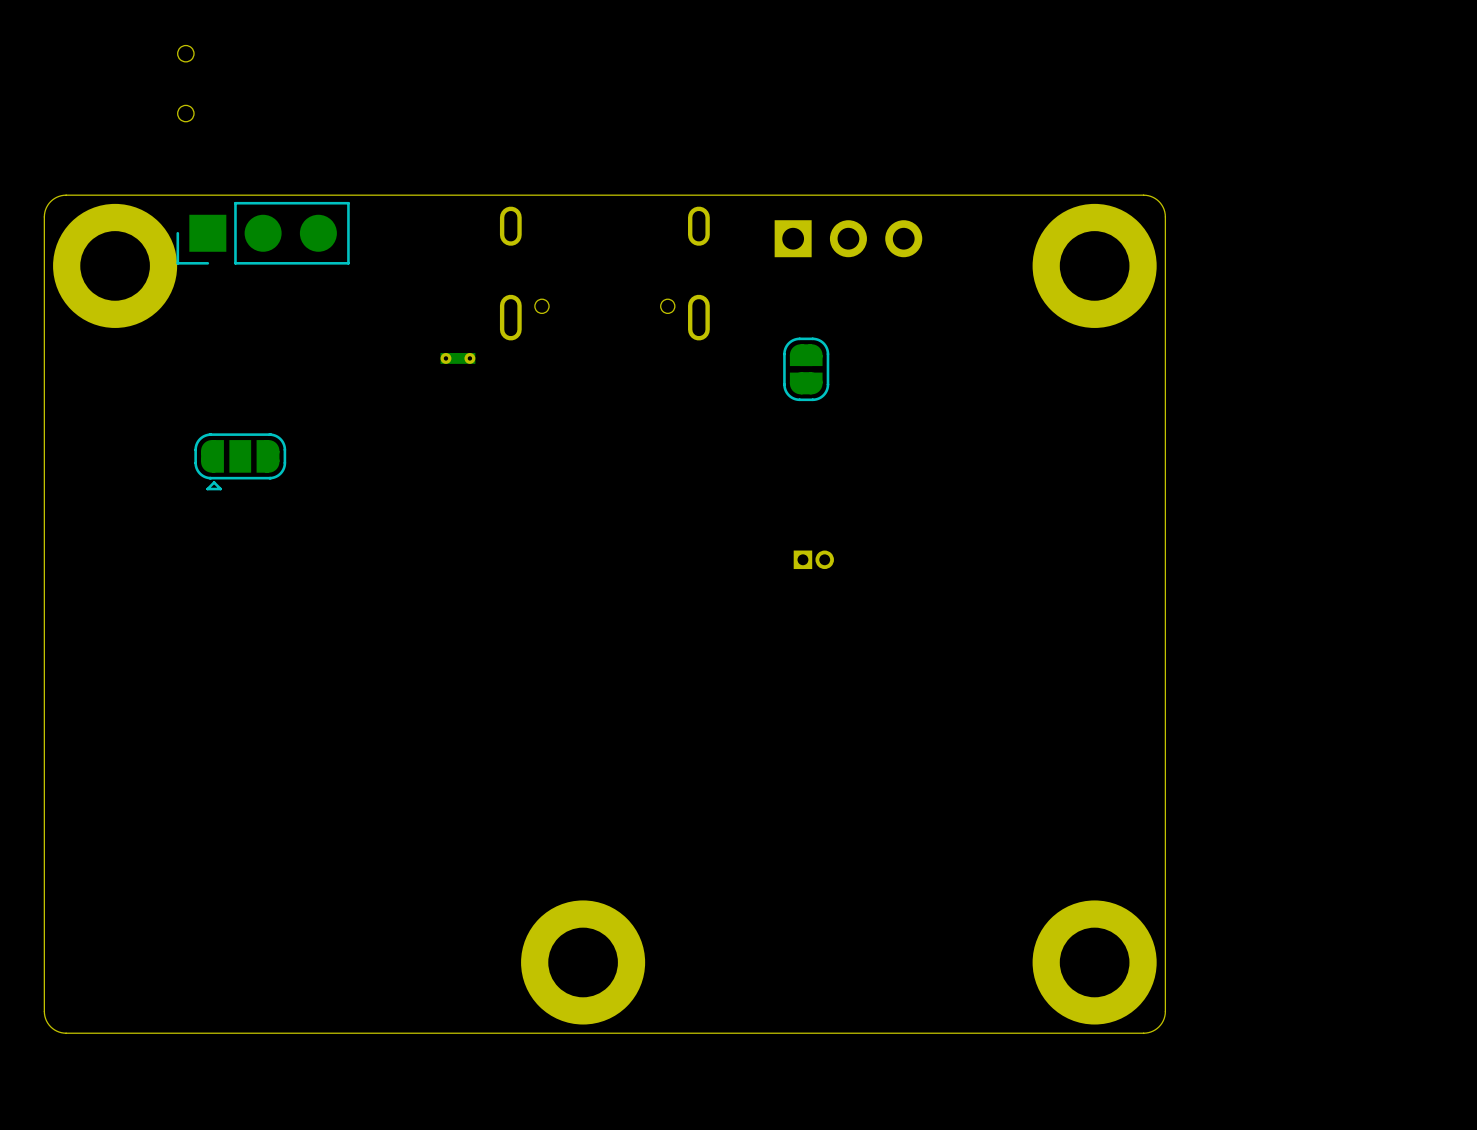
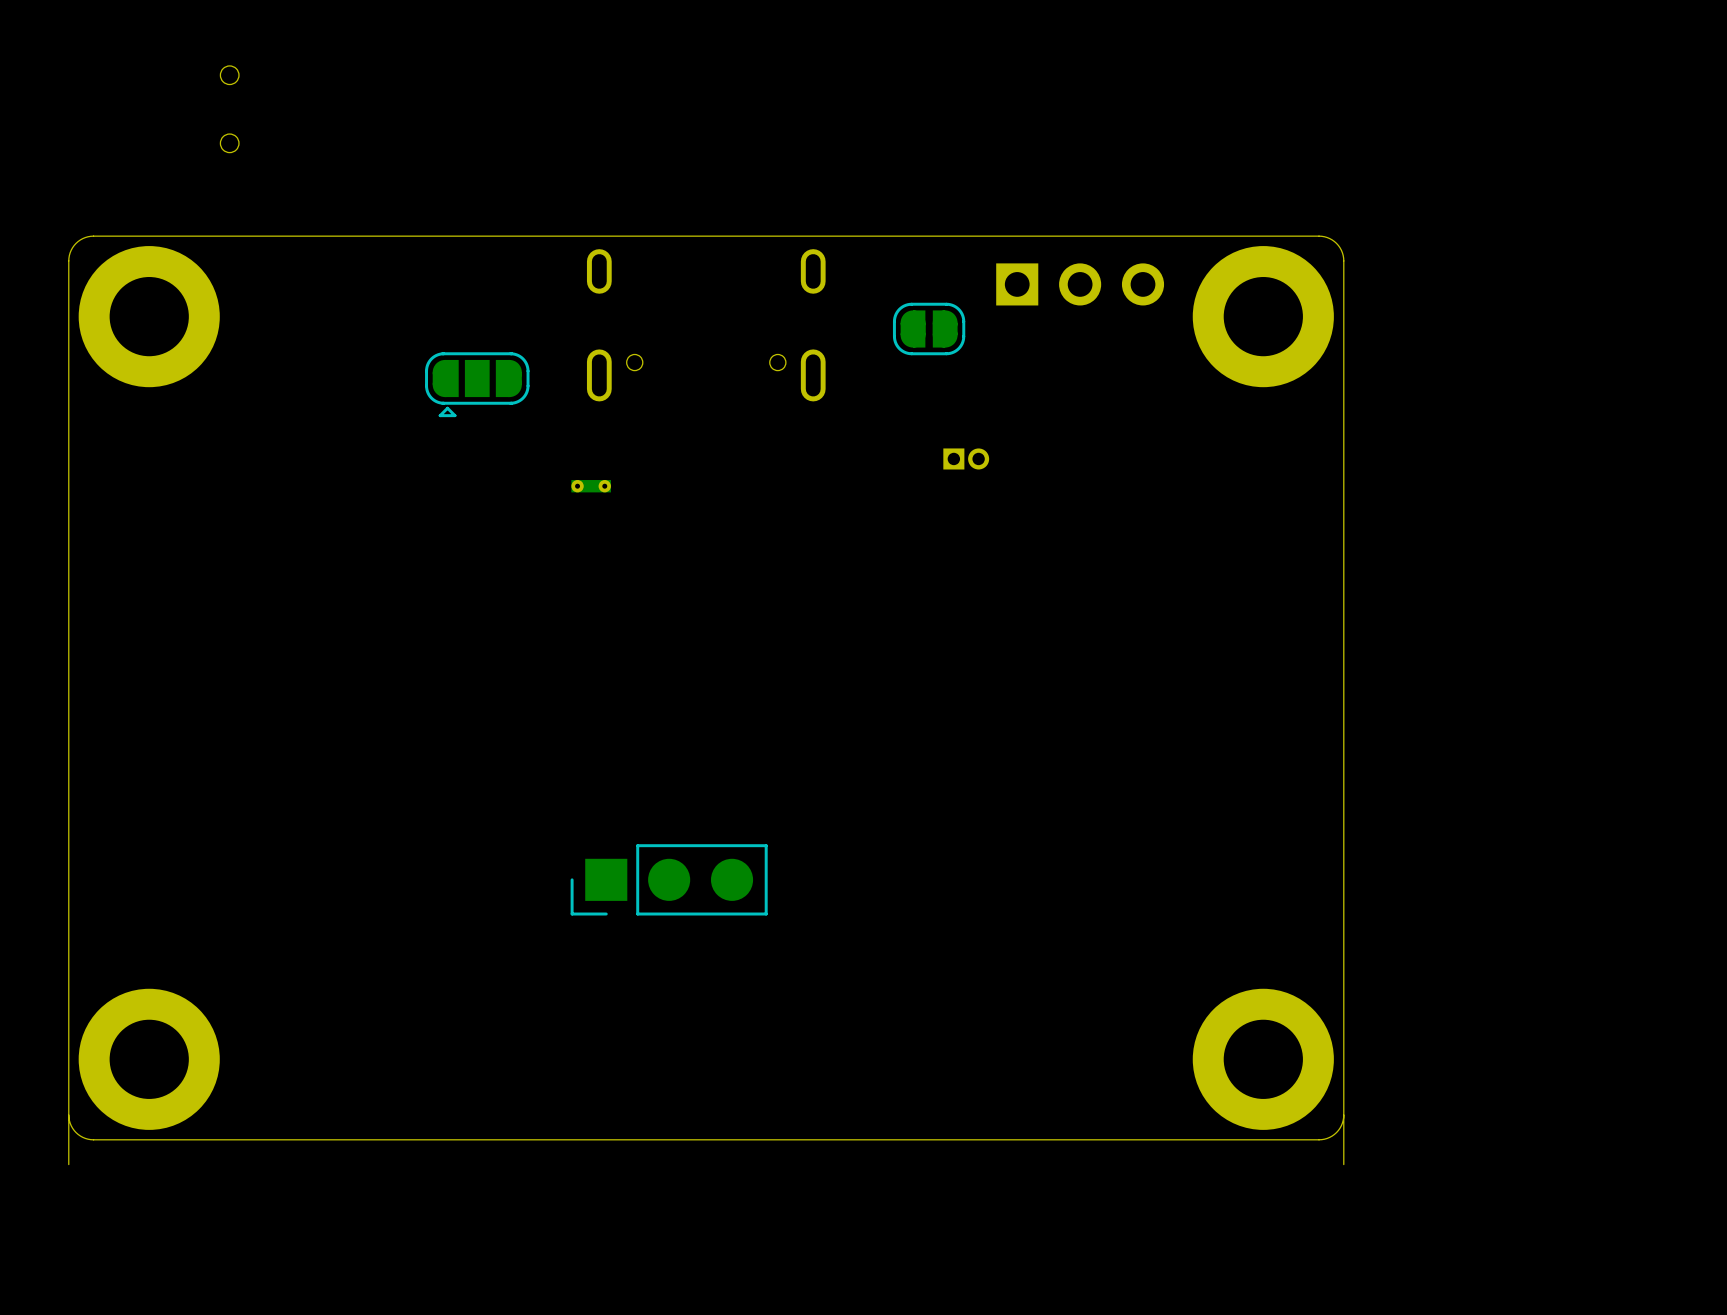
part: (263, 233) -> none
part position: (848, 238) -> (1080, 284)
part position: (457, 358) -> (591, 486)
part rotation: 0° (806, 369) -> 90° clockwise (929, 328)
part position: (806, 369) -> (929, 328)
part position: (240, 461) -> (477, 384)
part position: (813, 559) -> (966, 458)
part: none -> (669, 879)
part: none -> (149, 1059)
part: (583, 962) -> none
part position: (1094, 962) -> (1263, 1059)
board edge: (1165, 1011) (1163, 1020) (1159, 1026) (1153, 1031) (1143, 1033) (66, 1033) (56, 1031) (50, 1026) (45, 1018) (44, 1011) -> (1343, 1115) (1341, 1125) (1336, 1132) (1327, 1138) (1319, 1139) (93, 1139) (82, 1137) (76, 1132) (71, 1125) (68, 1115)

